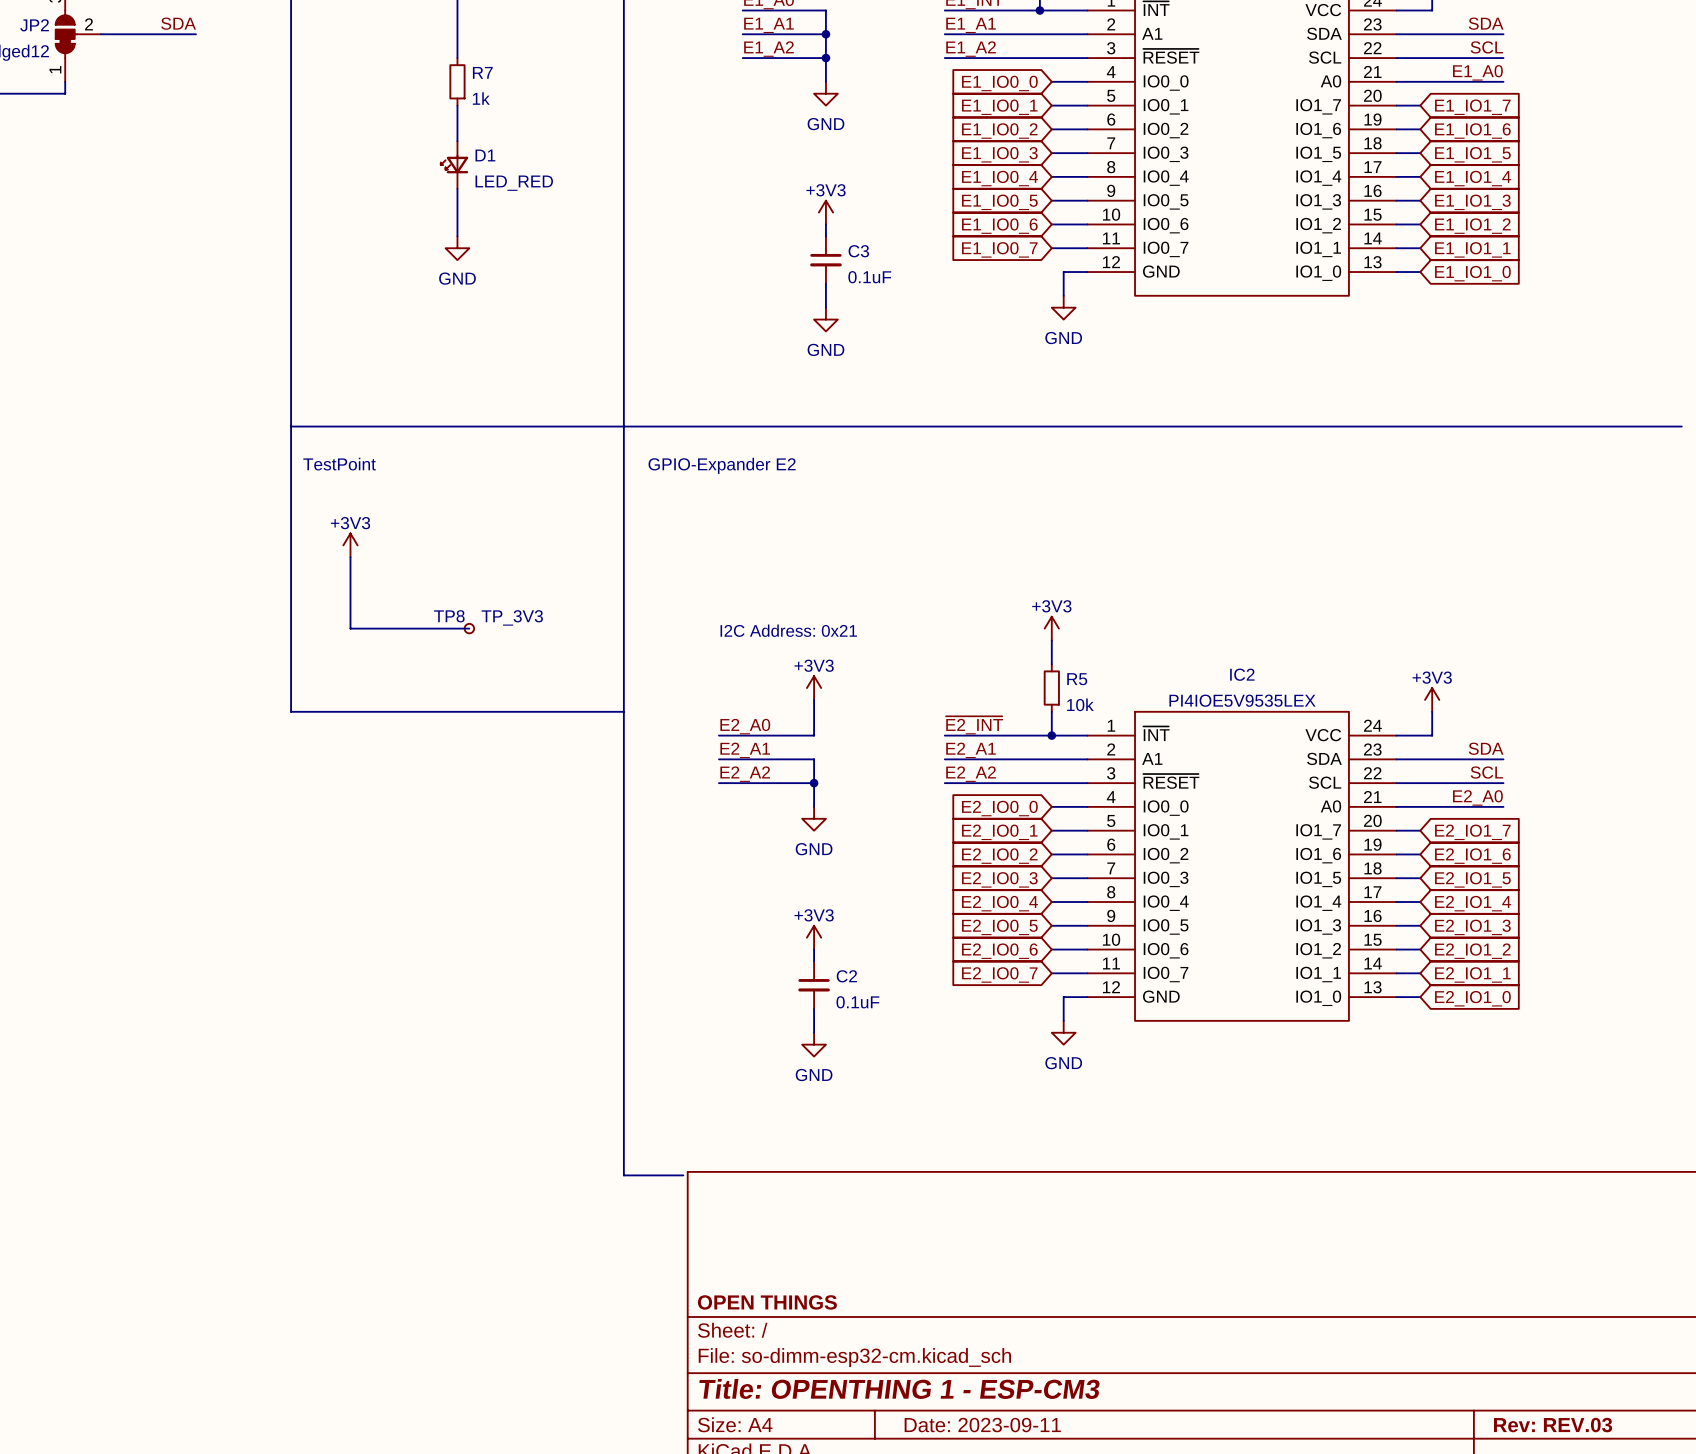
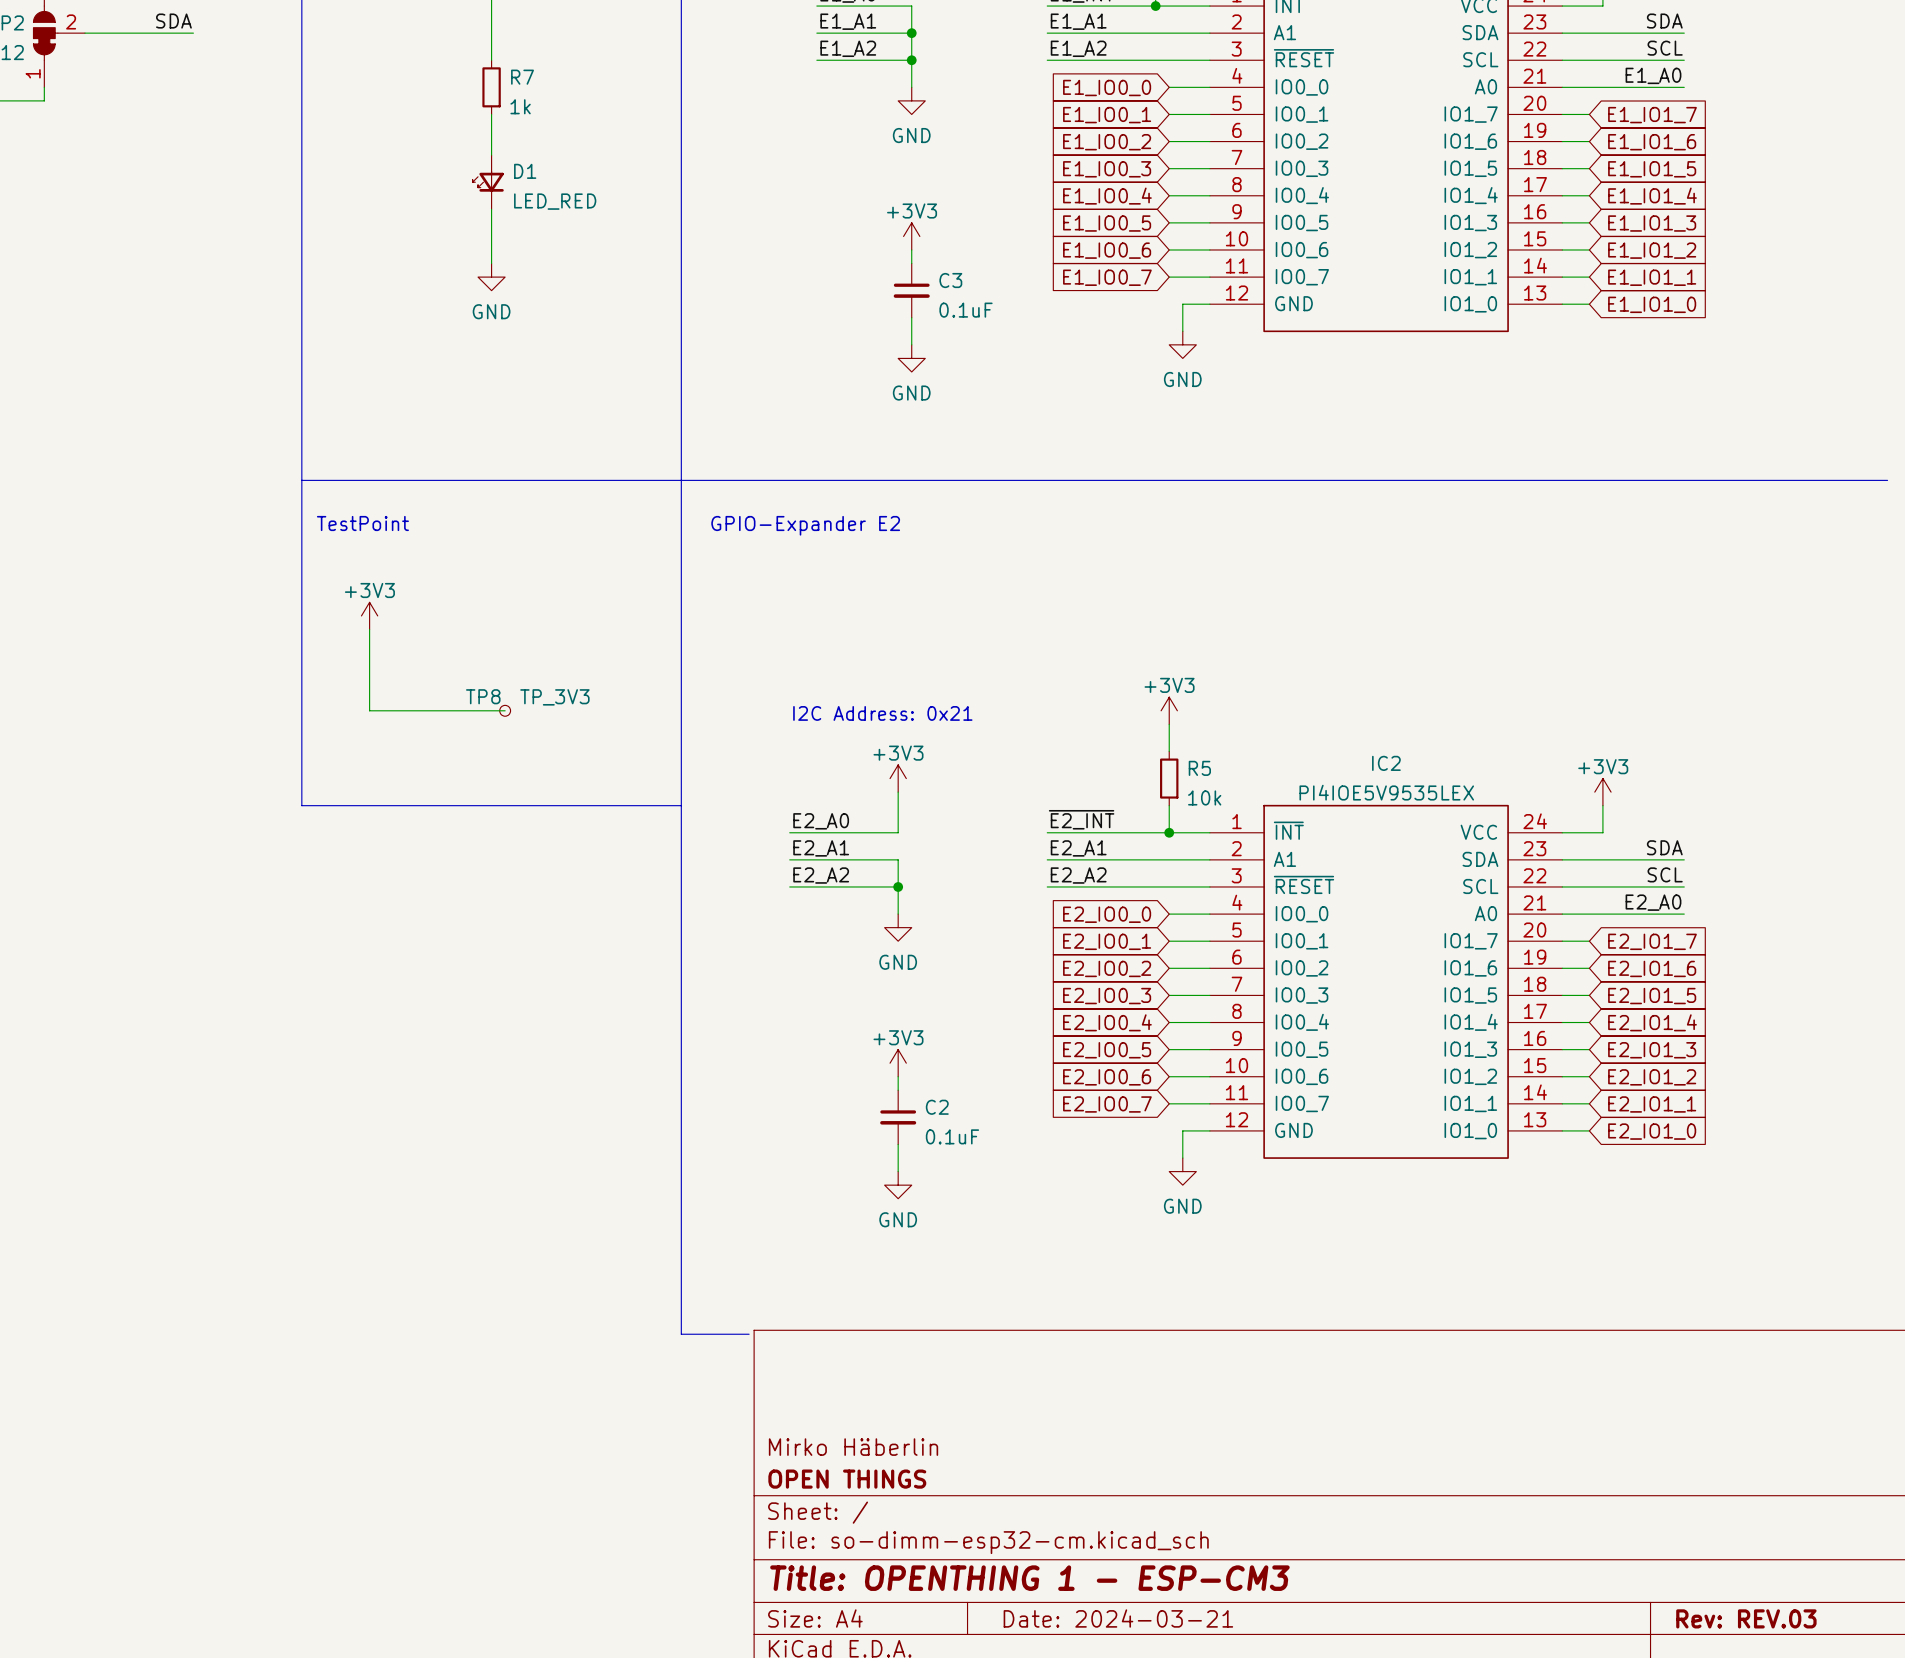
title block: none -> Mirko Häberlin (853, 1447)
title block: Date: 2023-09-11 (982, 1425) -> Date: 2024-03-21 (1118, 1618)

